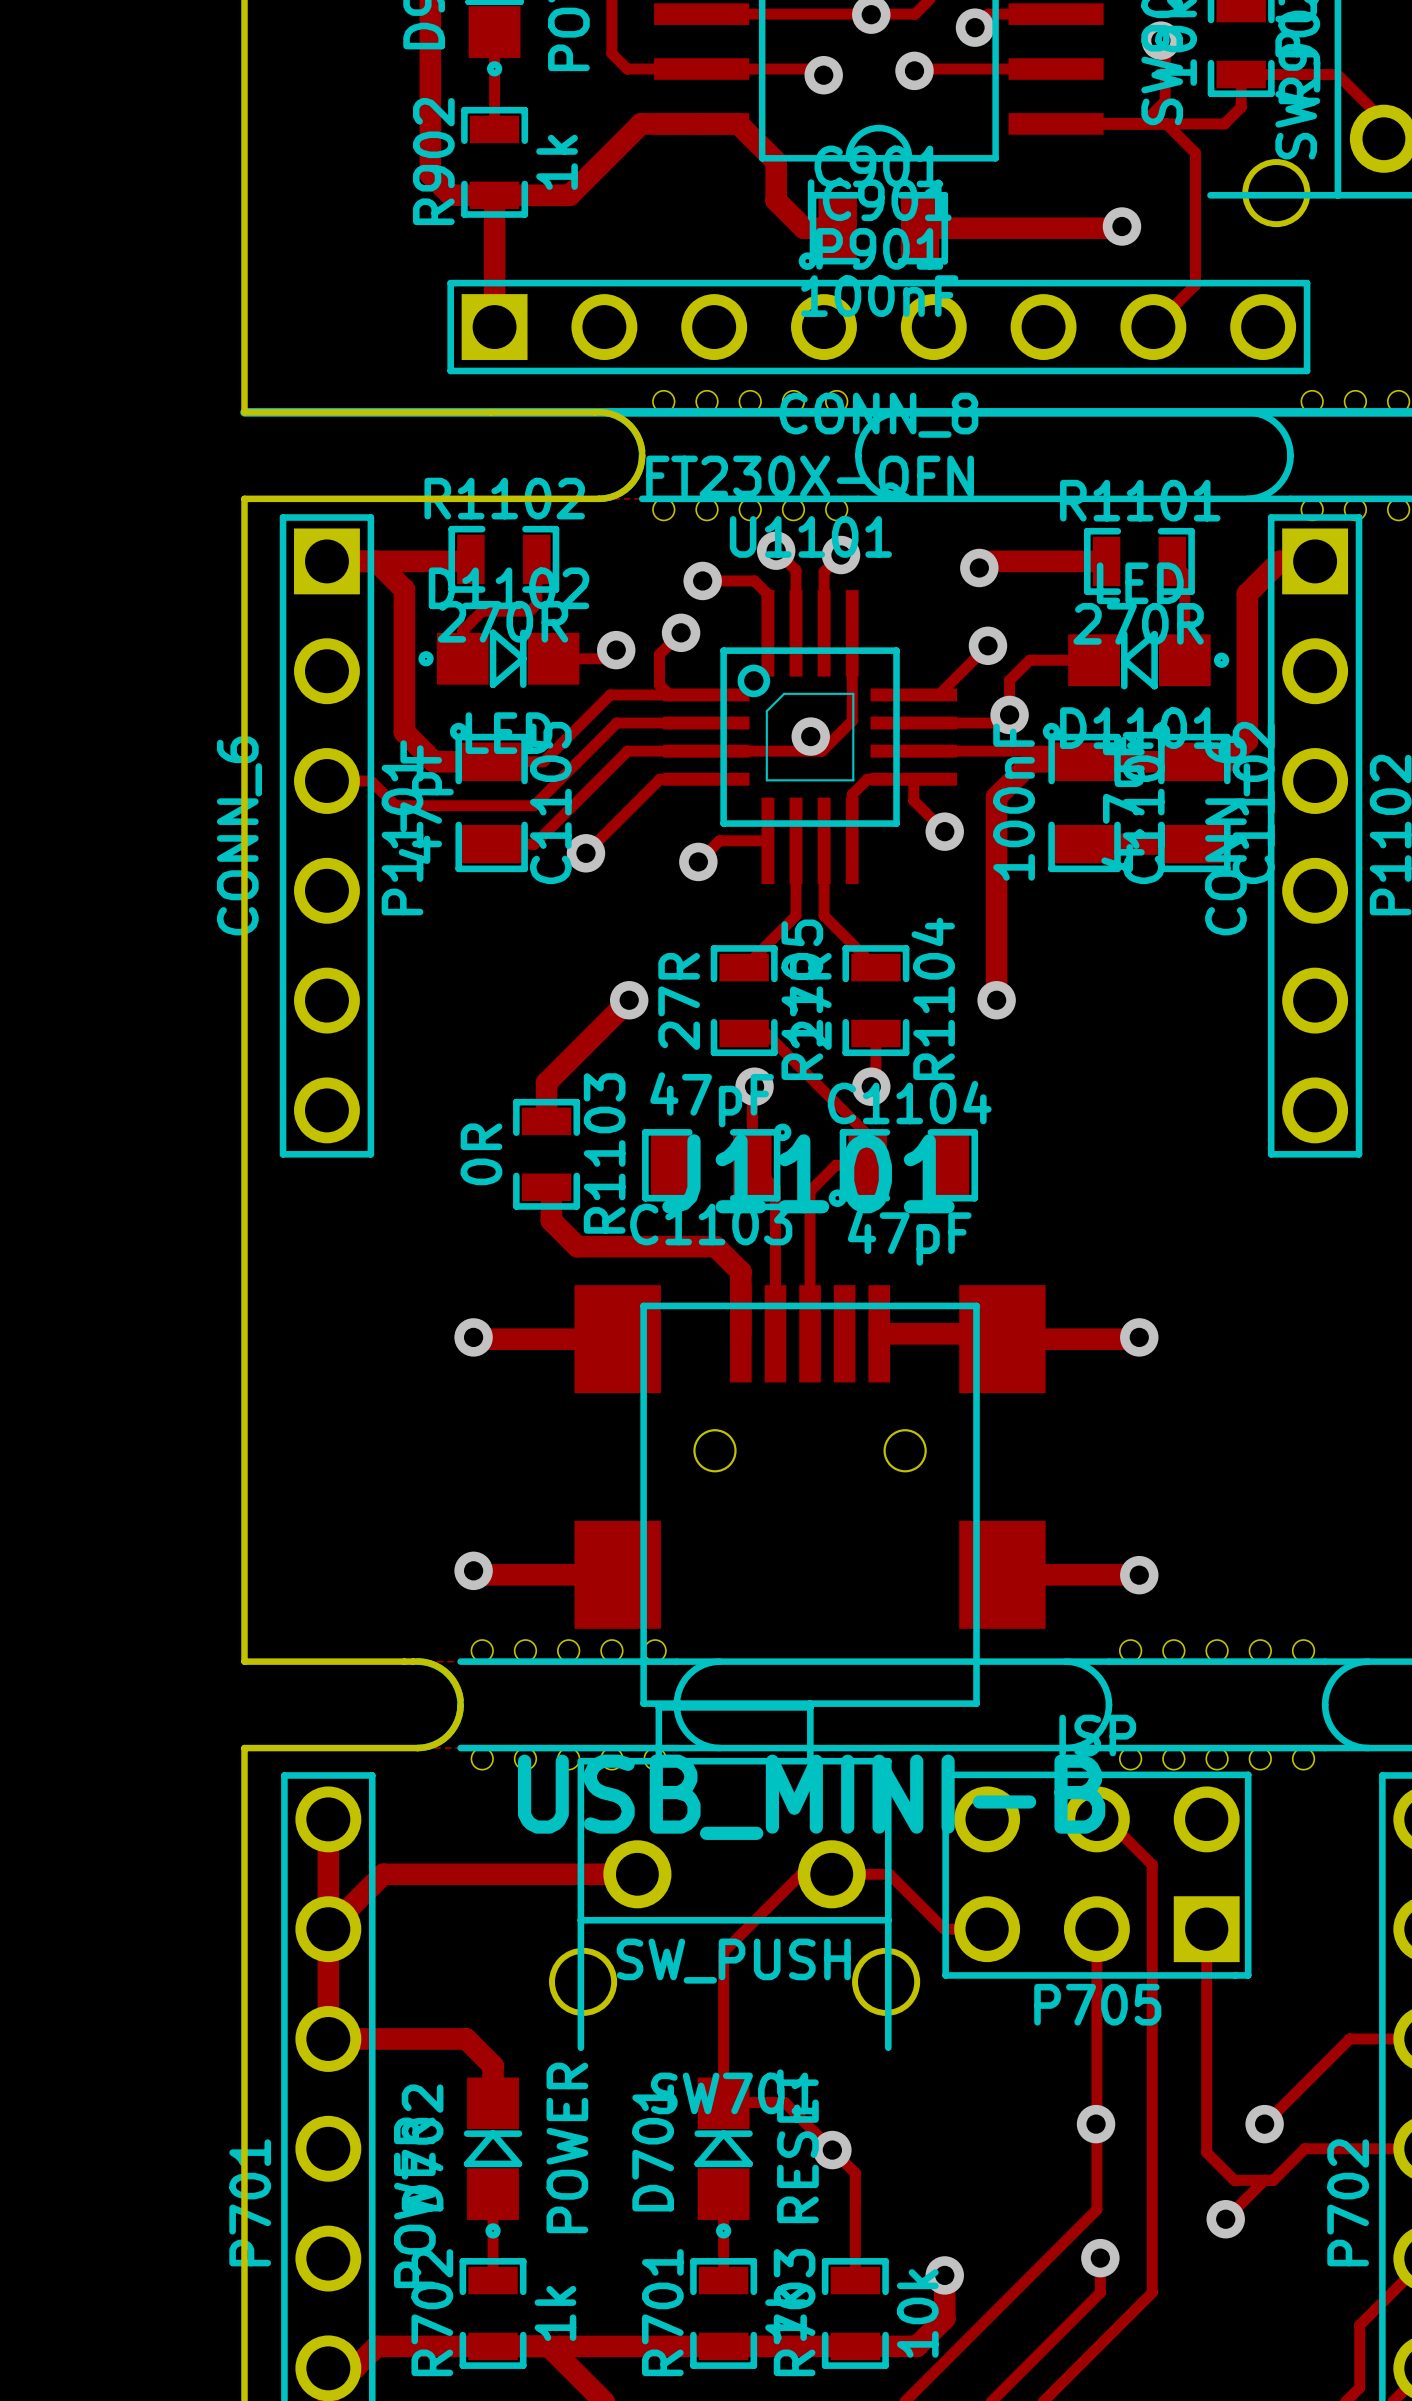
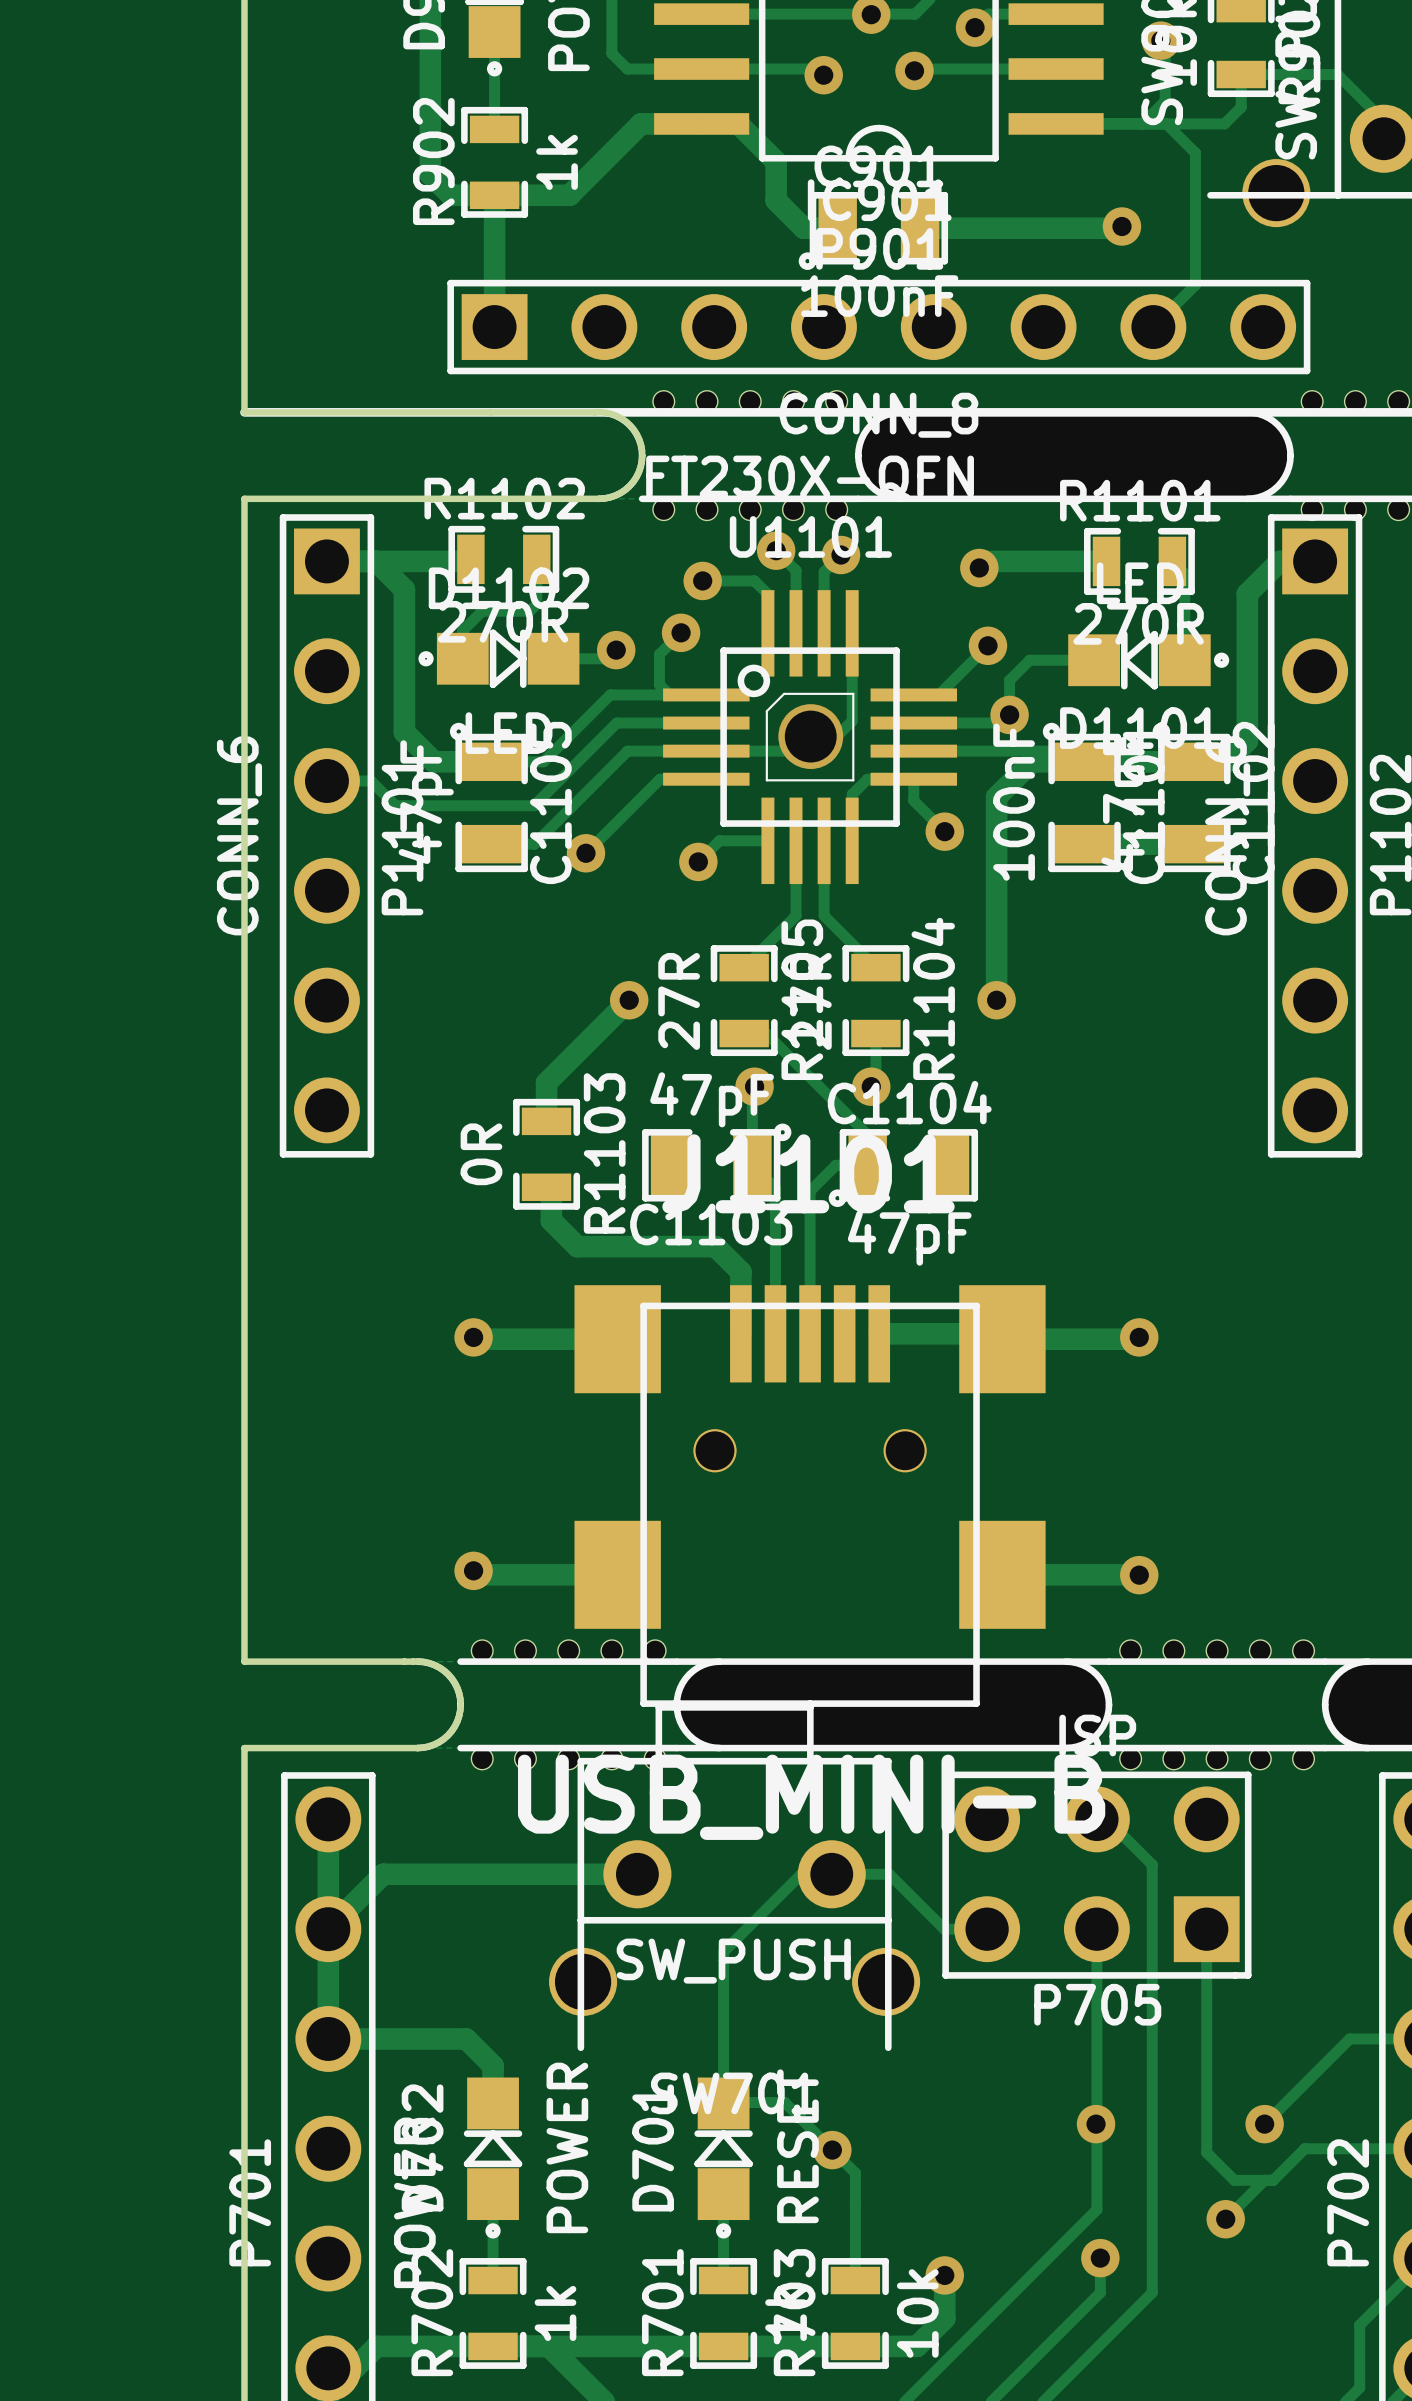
via size: [791, 717, 830, 756] -> [778, 704, 844, 769]

